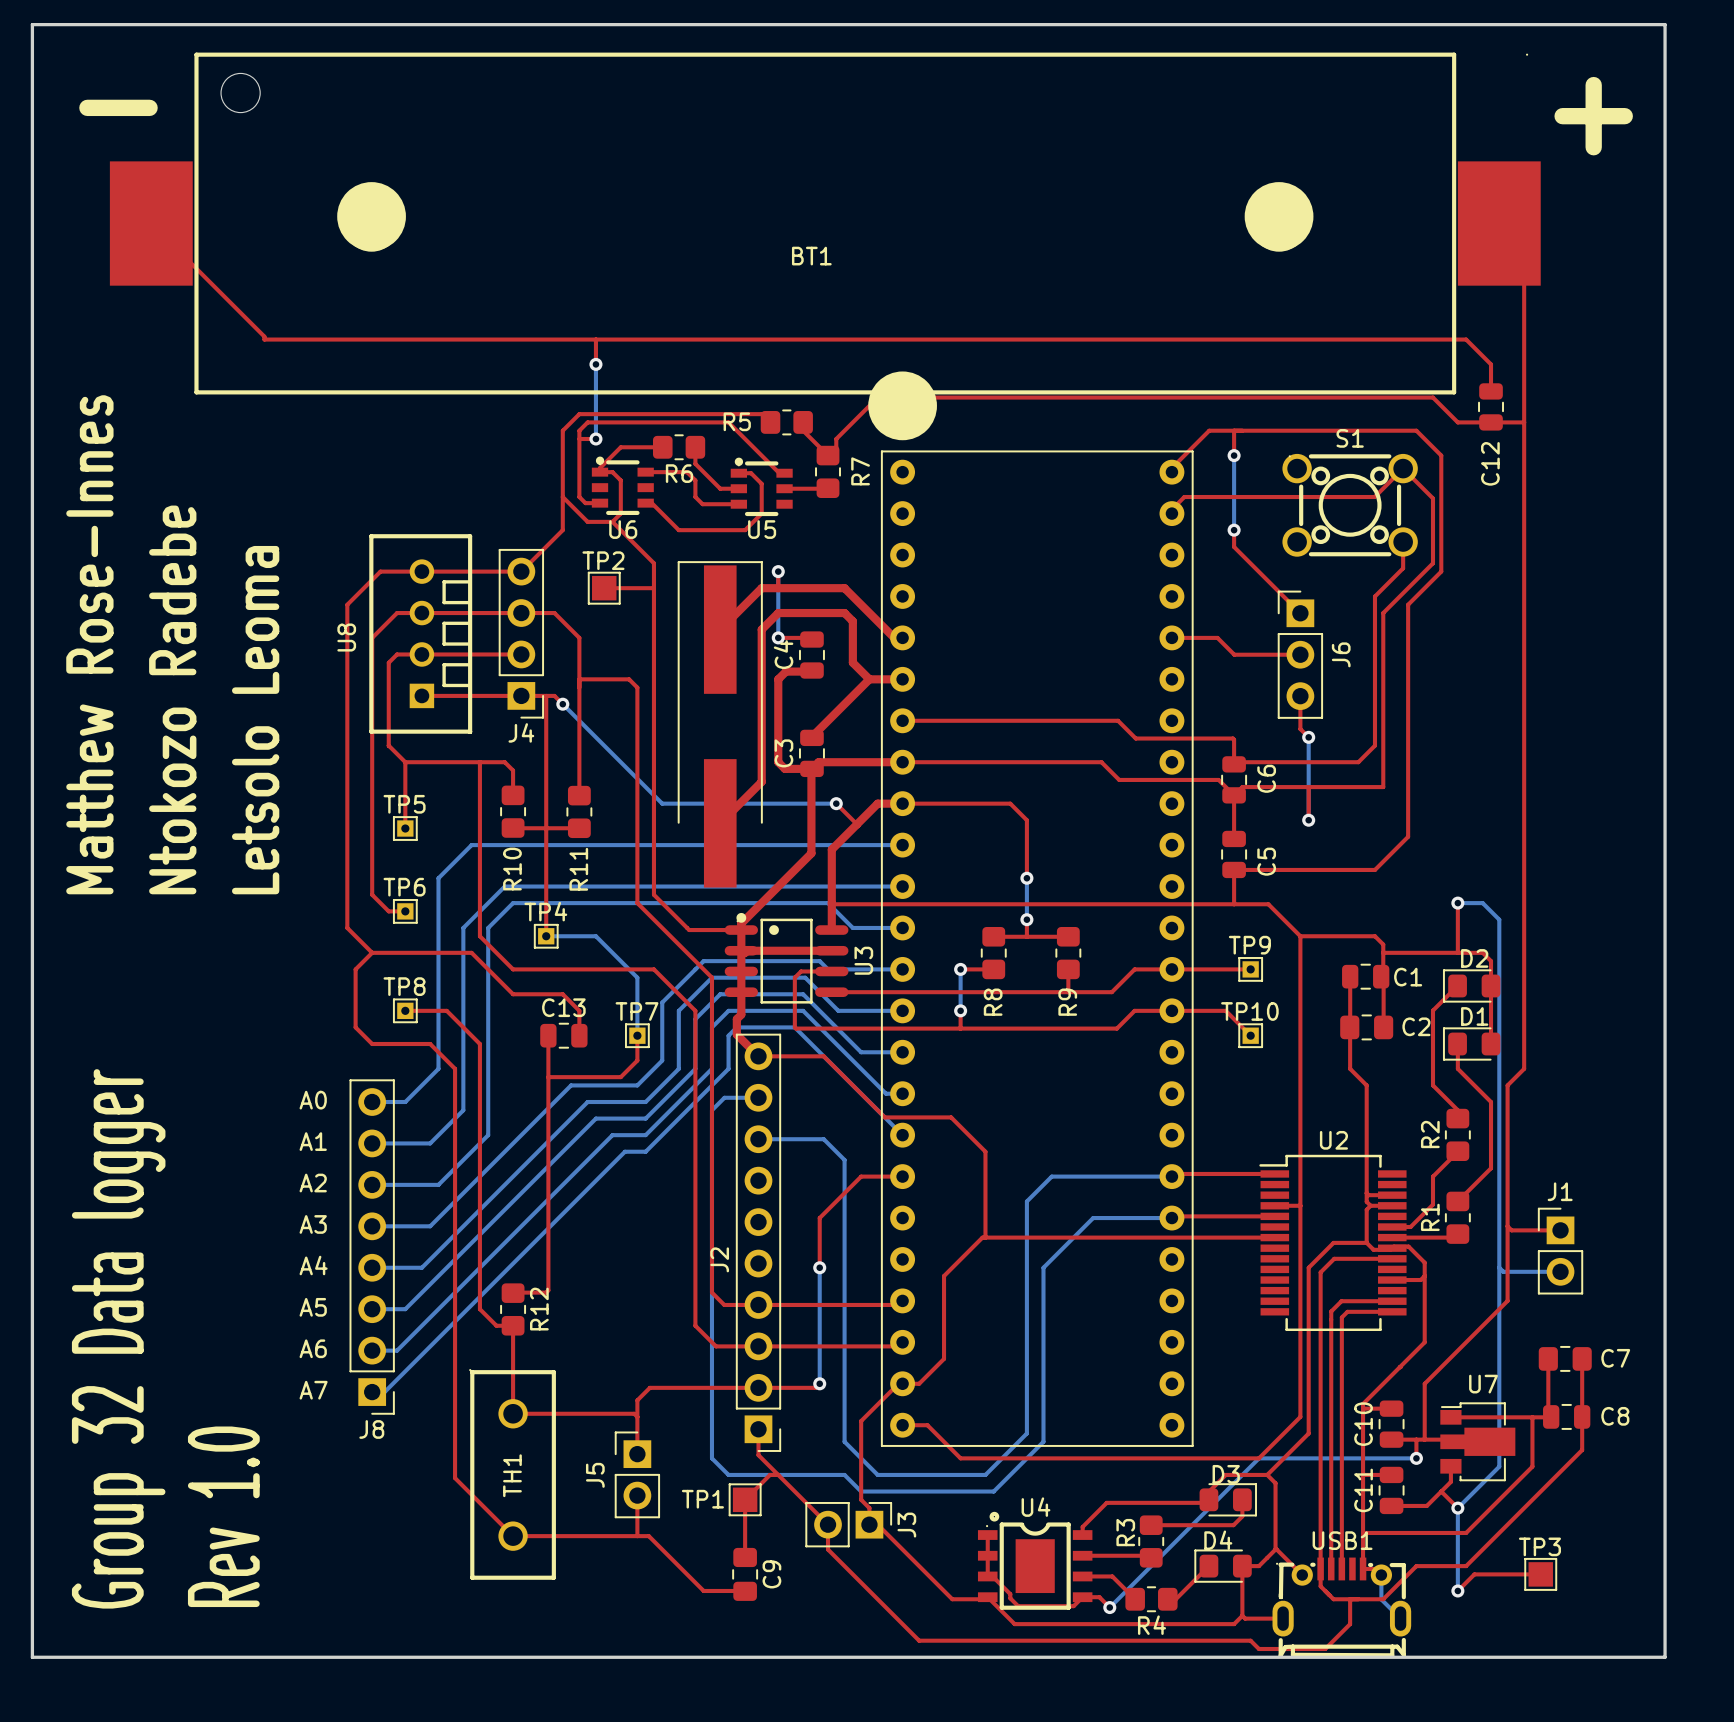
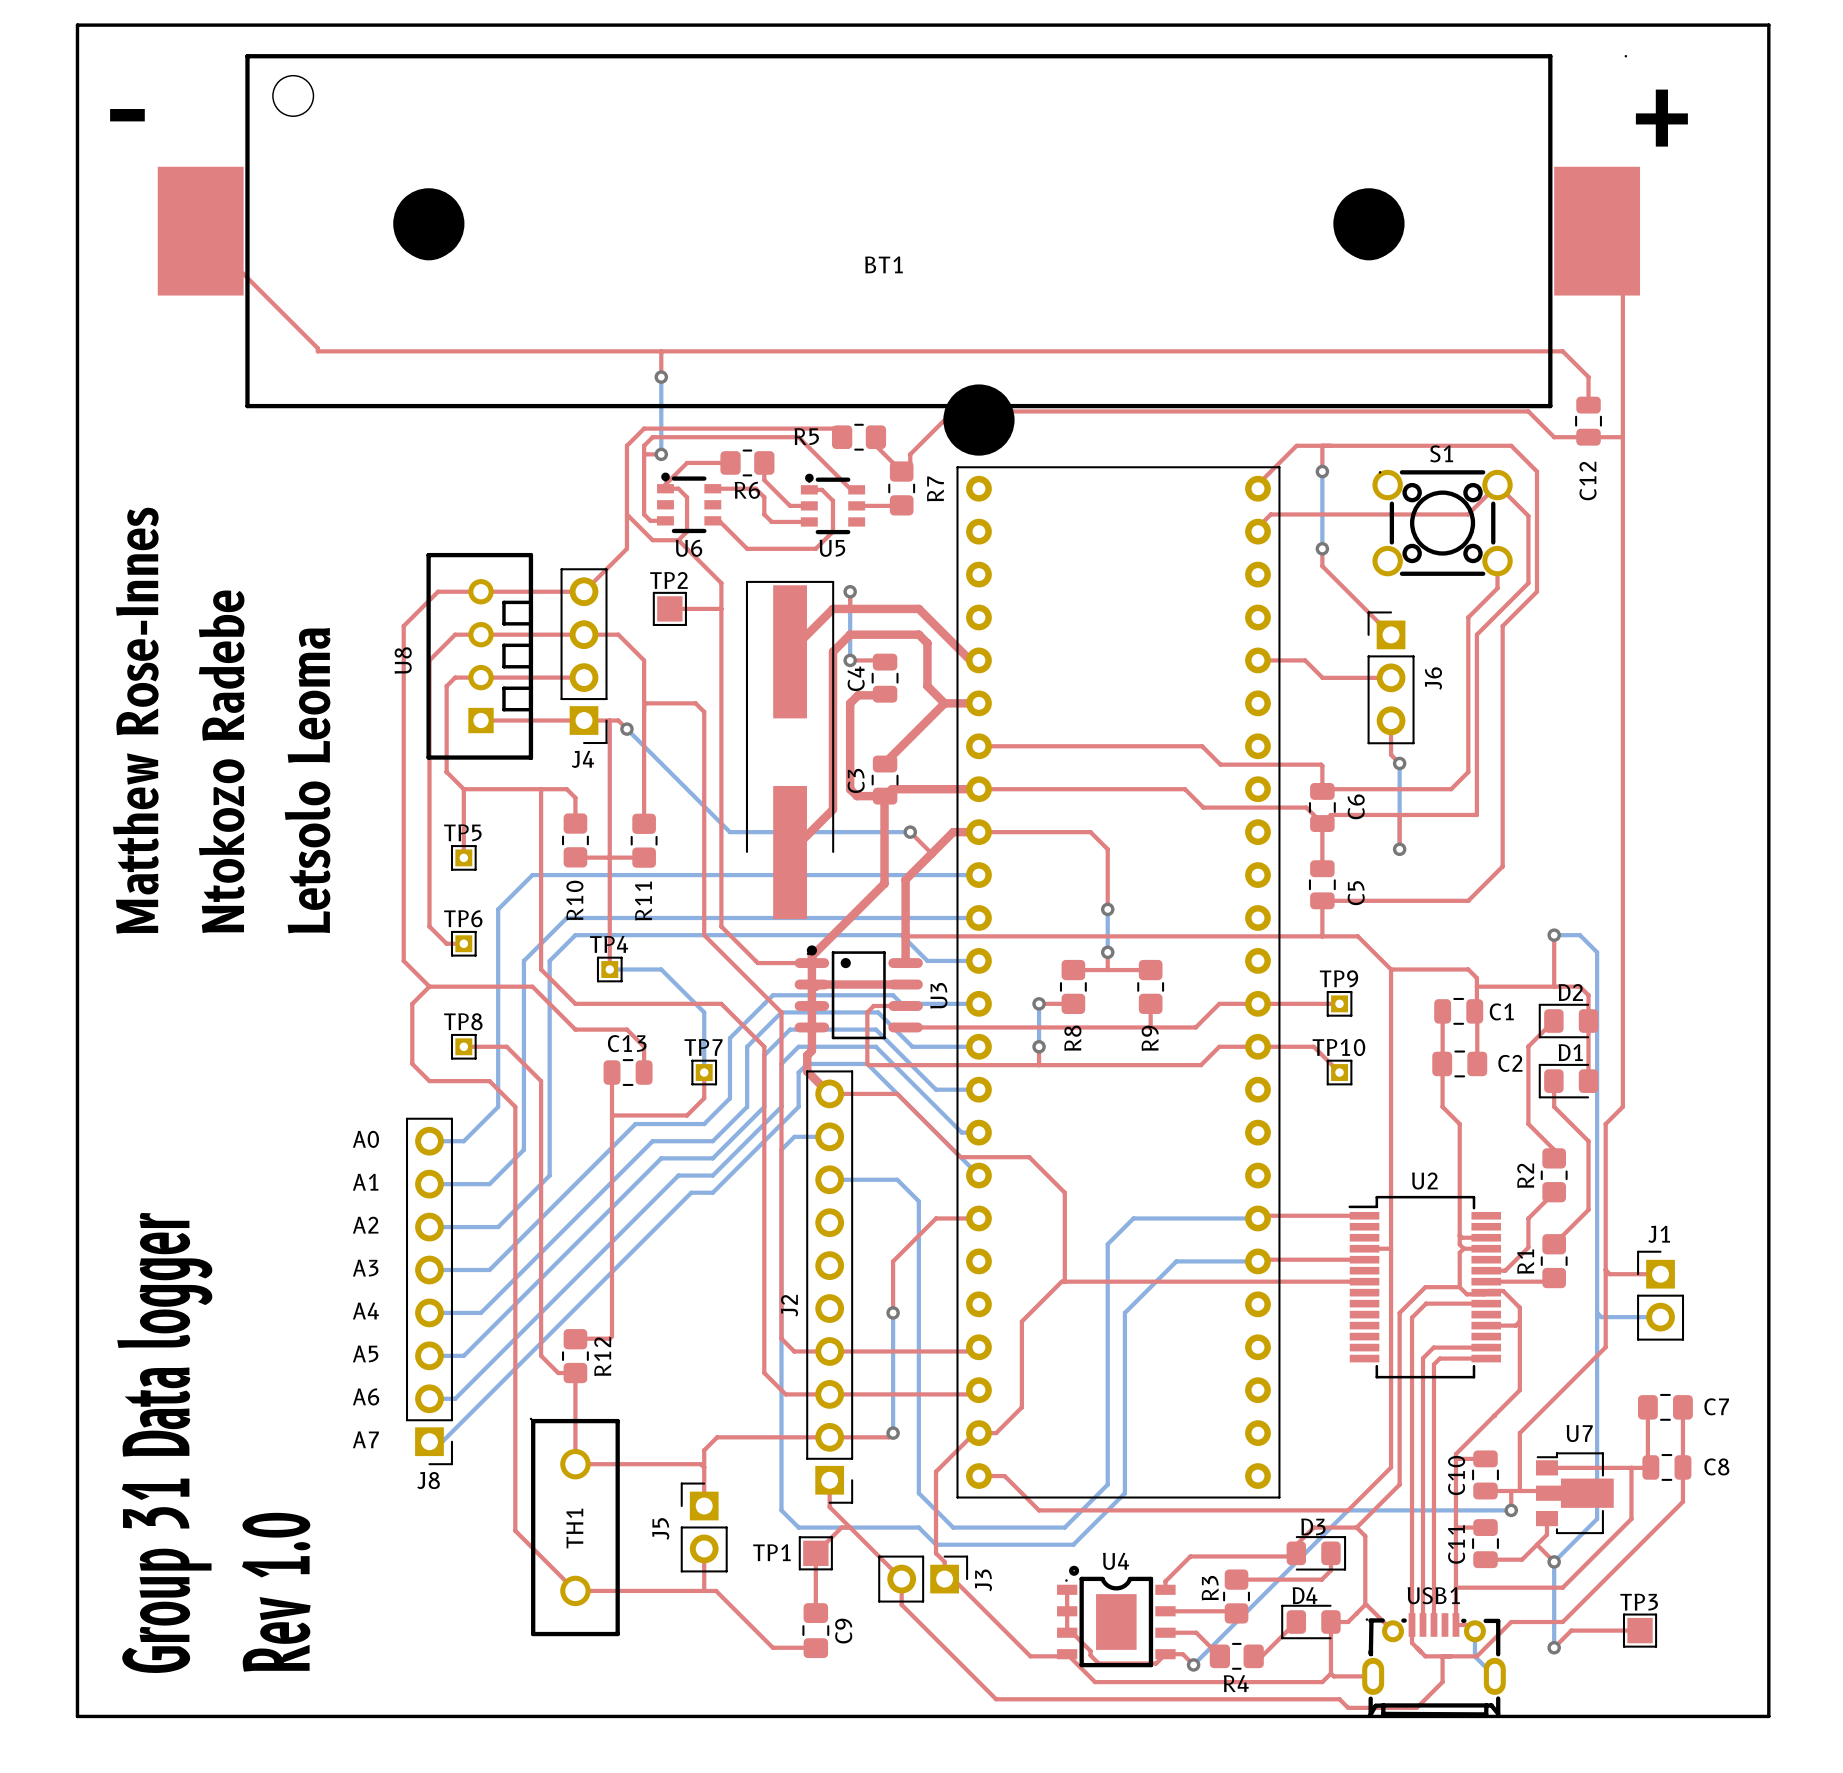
text: Group 32 Data logger (118, 1338) -> Group 31 Data logger (164, 1442)

